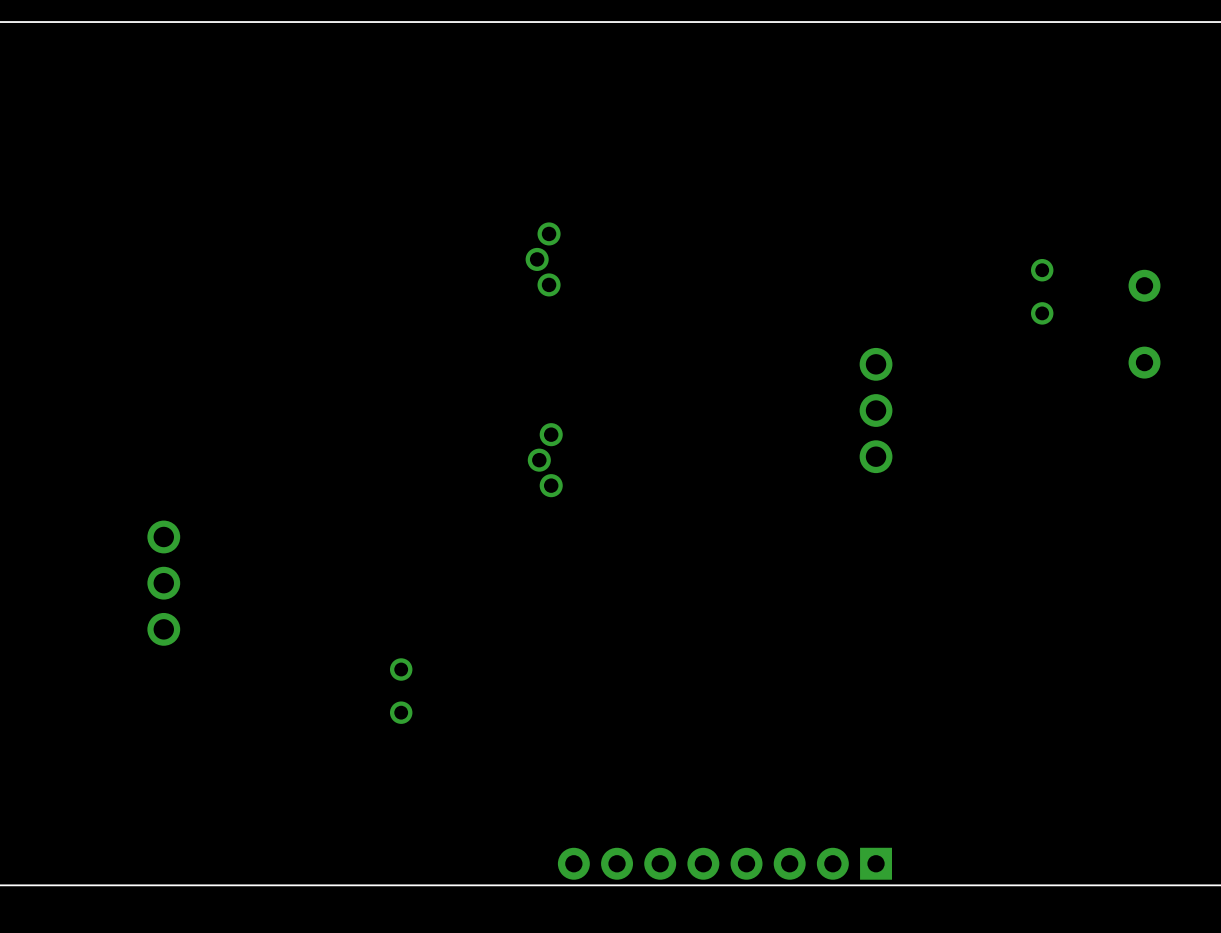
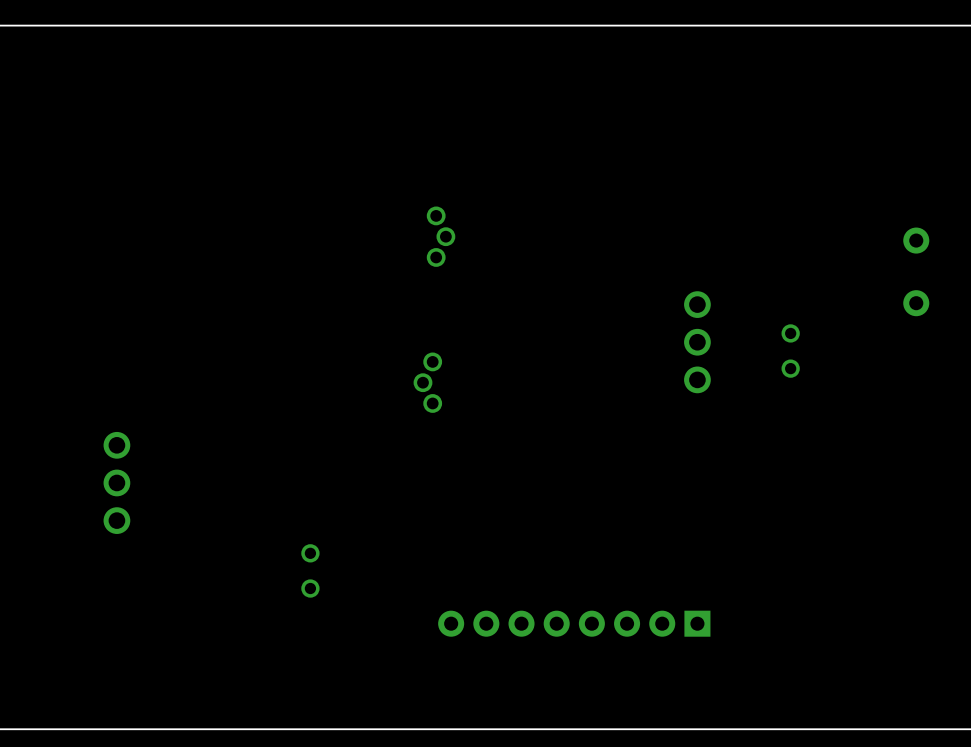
part rotation: 0° (543, 259) -> 180° (441, 236)
part position: (1042, 291) -> (790, 351)
part position: (724, 863) -> (574, 623)

